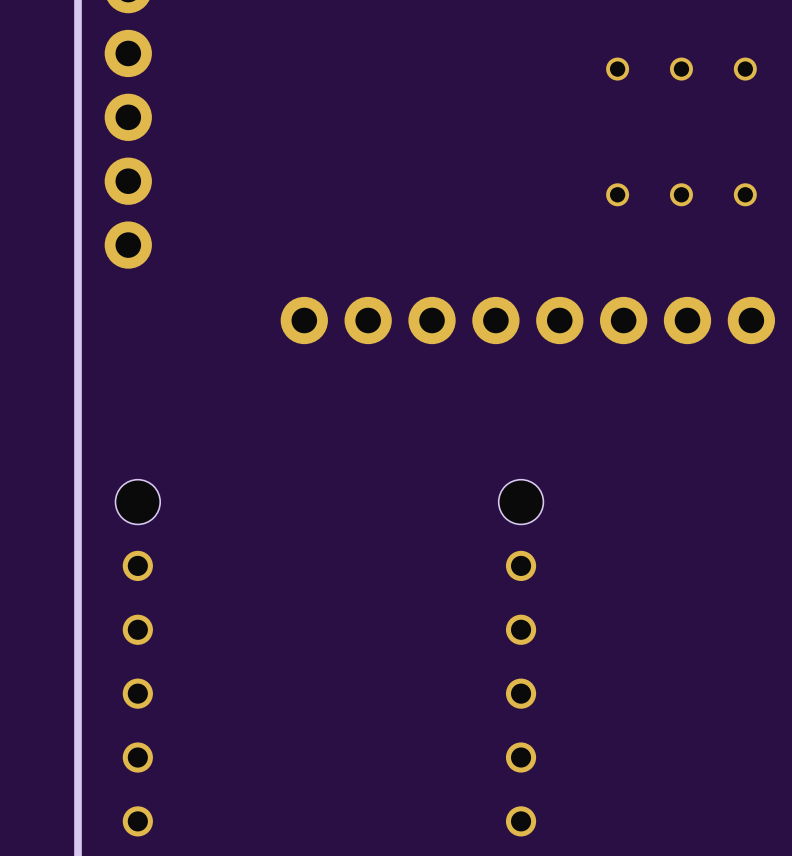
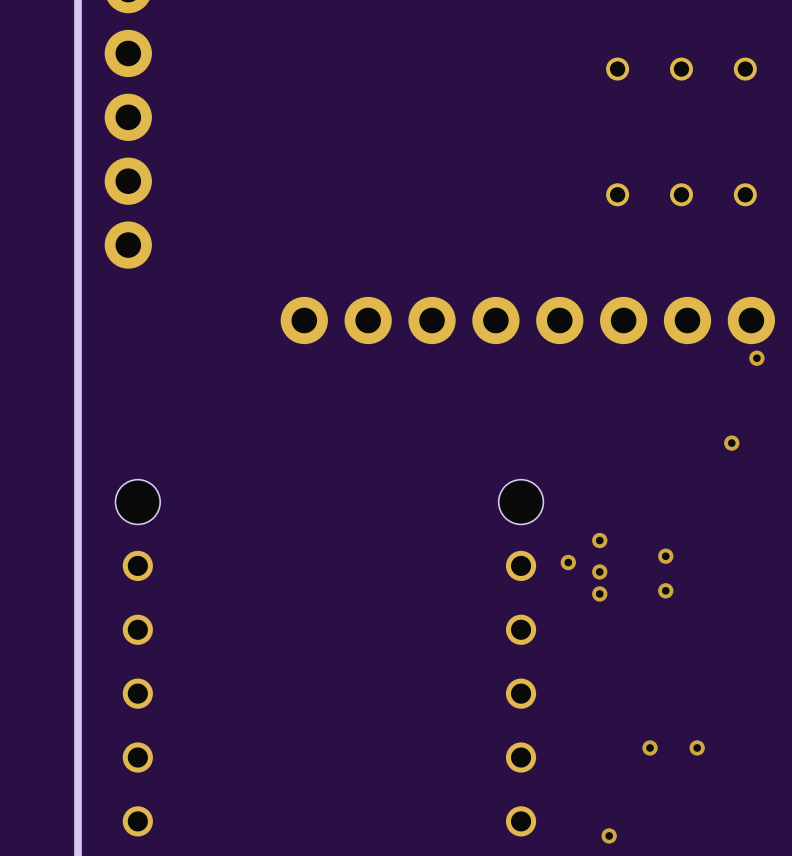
via: none -> (756, 358)
via: none -> (731, 443)
via: none -> (599, 540)
via: none -> (665, 556)
via: none -> (568, 562)
via: none -> (599, 571)
via: none -> (665, 590)
via: none -> (599, 593)
via: none -> (650, 747)
via: none -> (697, 747)
via: none -> (609, 835)

